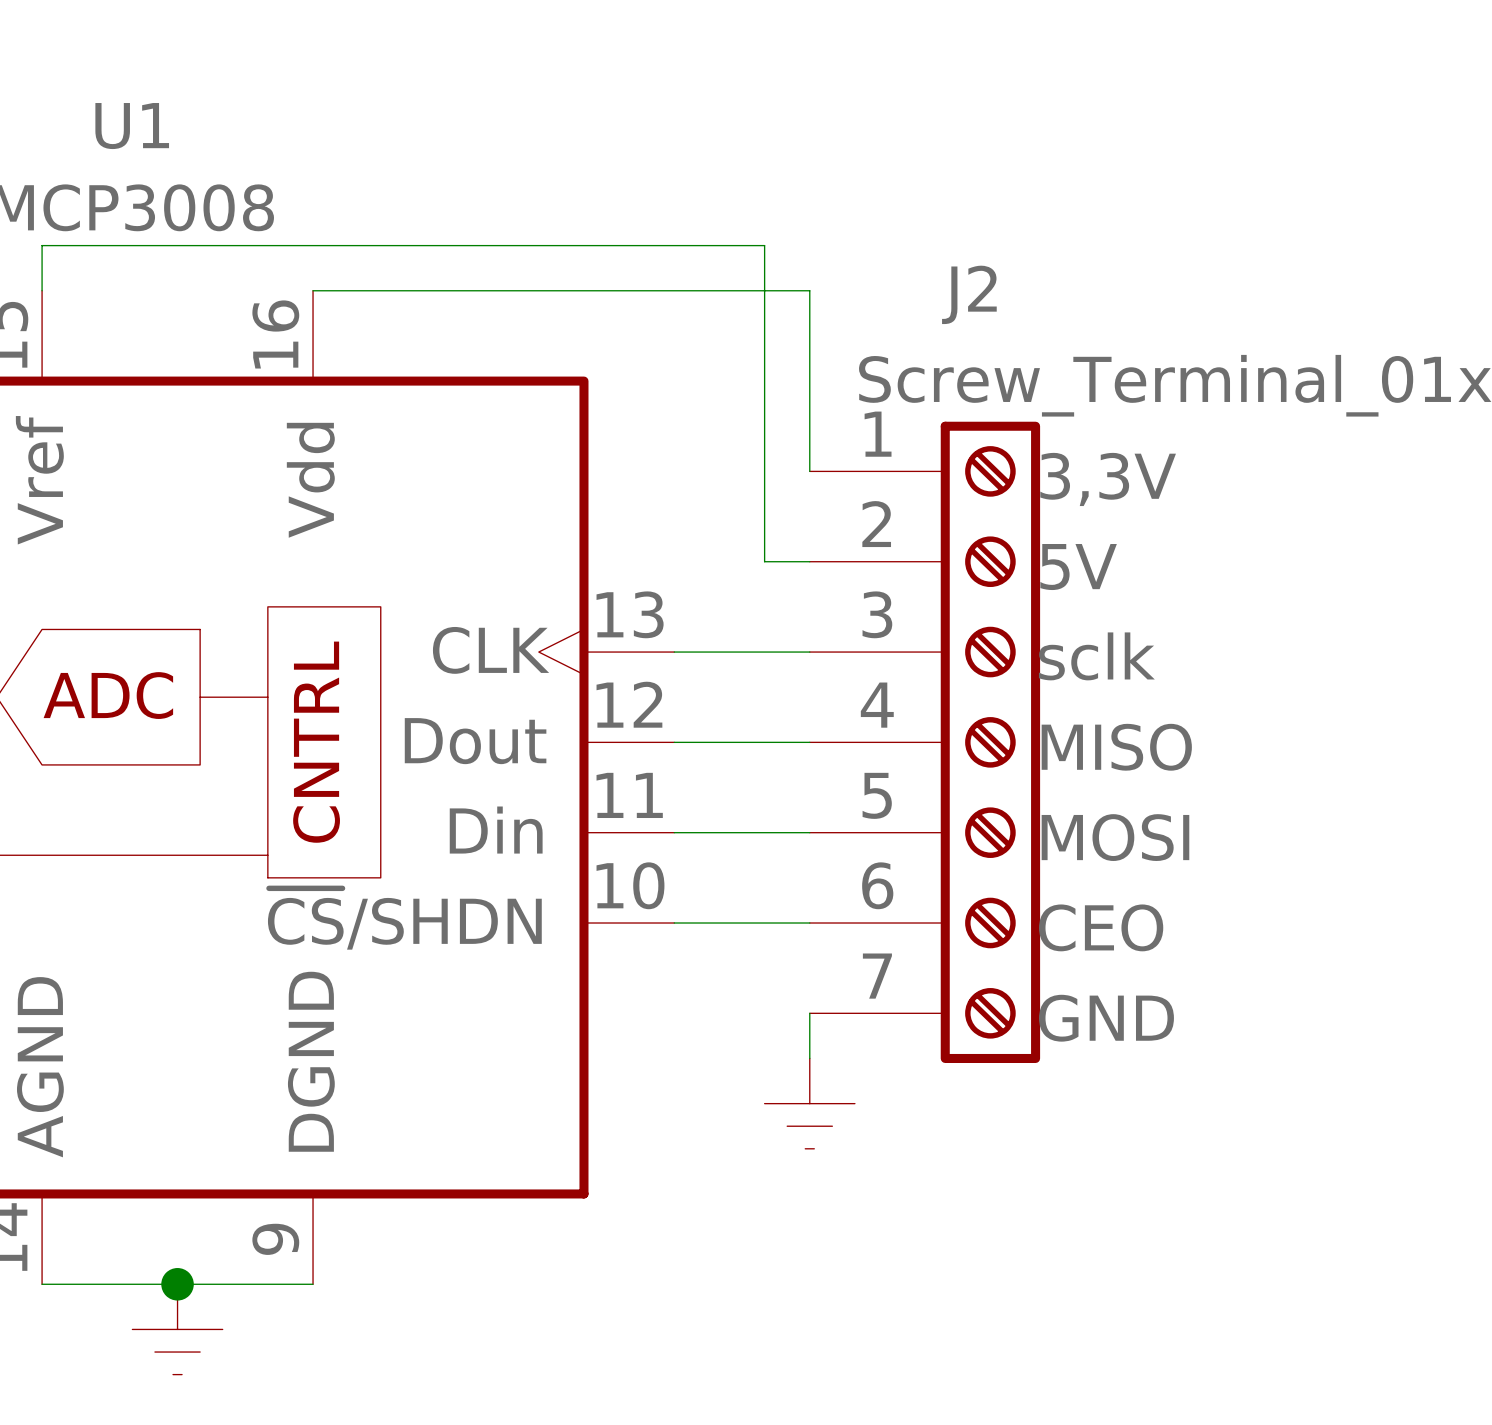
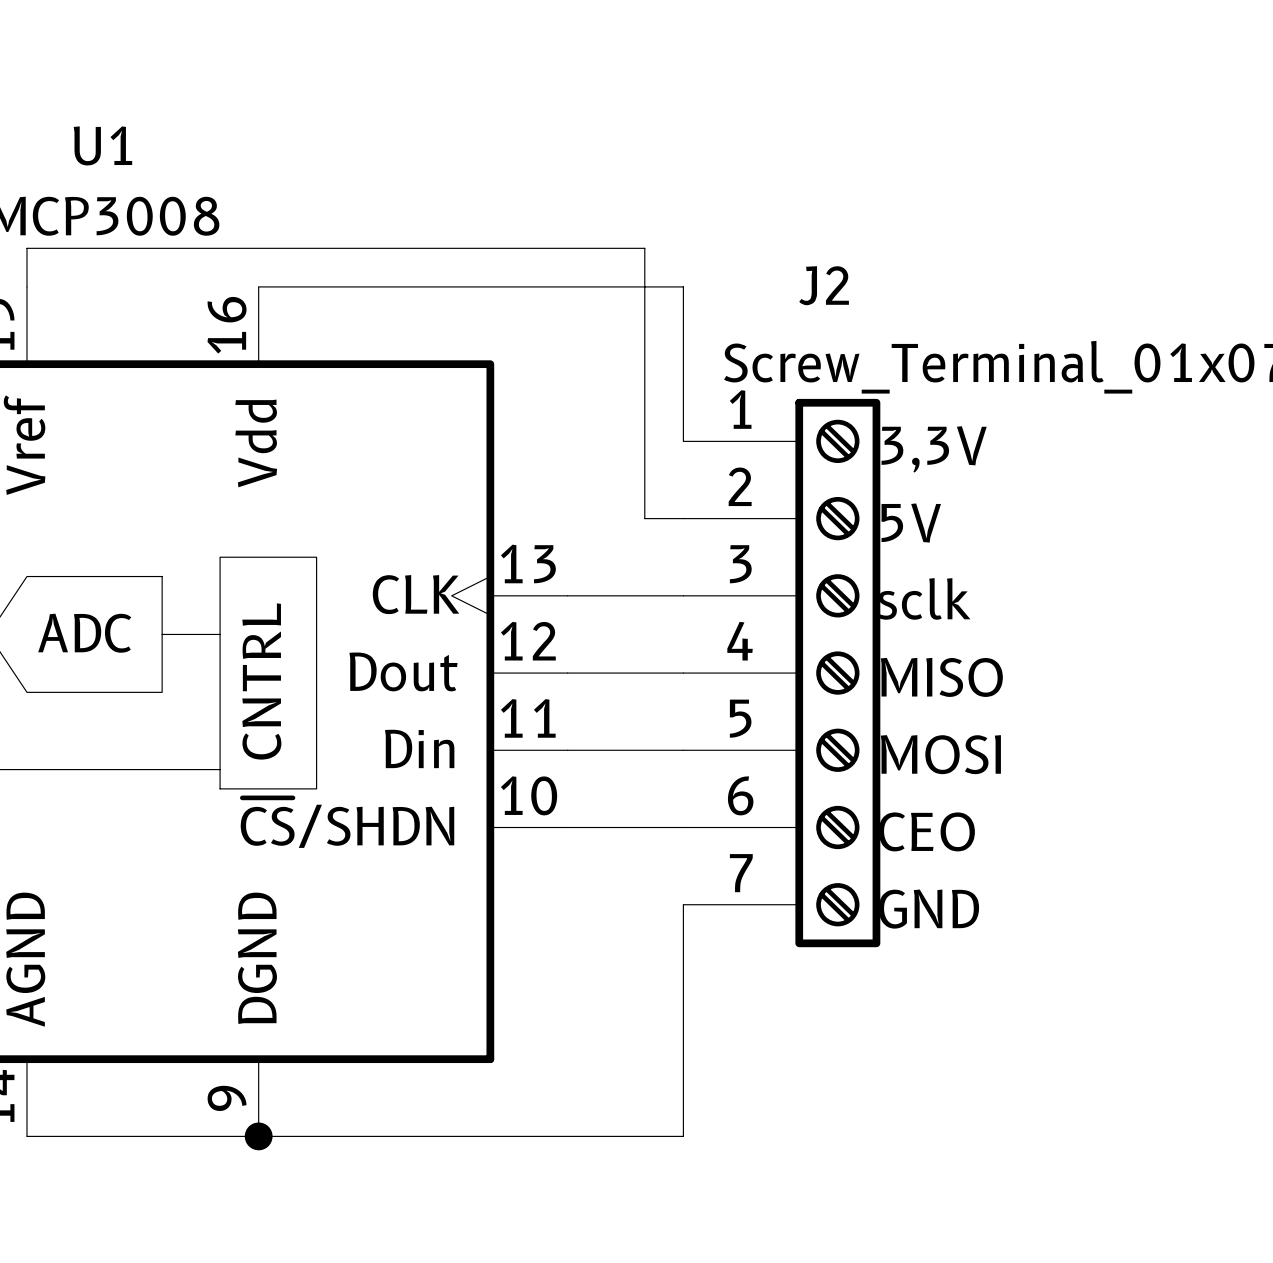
wire: none -> (683, 943) (683, 1136) (258, 1136)
power symbol: (809, 1103) -> none
junction position: (177, 1284) -> (258, 1136)
power symbol: (177, 1329) -> none

